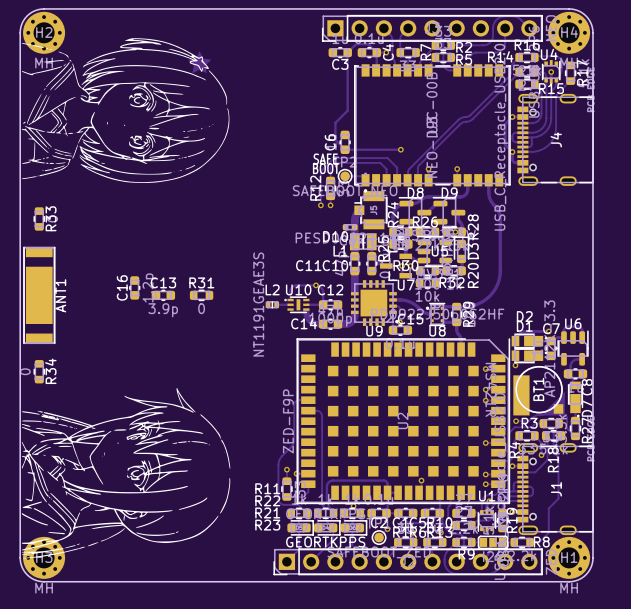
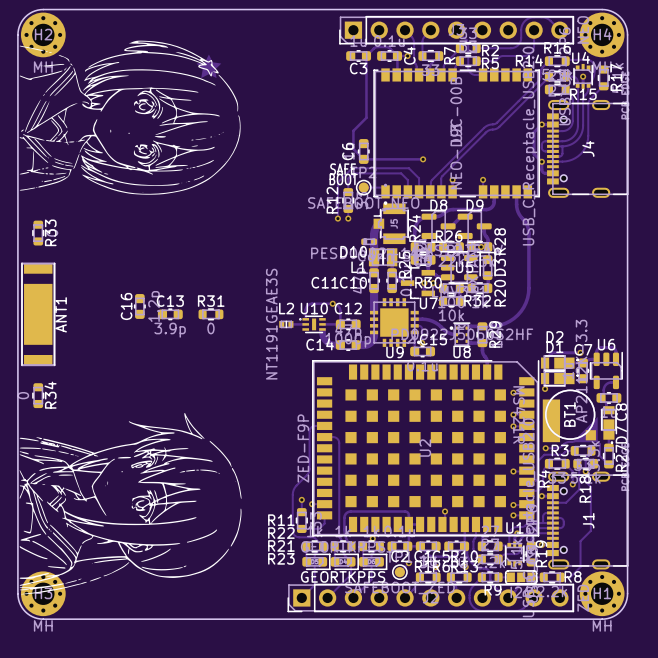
via: none -> (585, 471)

